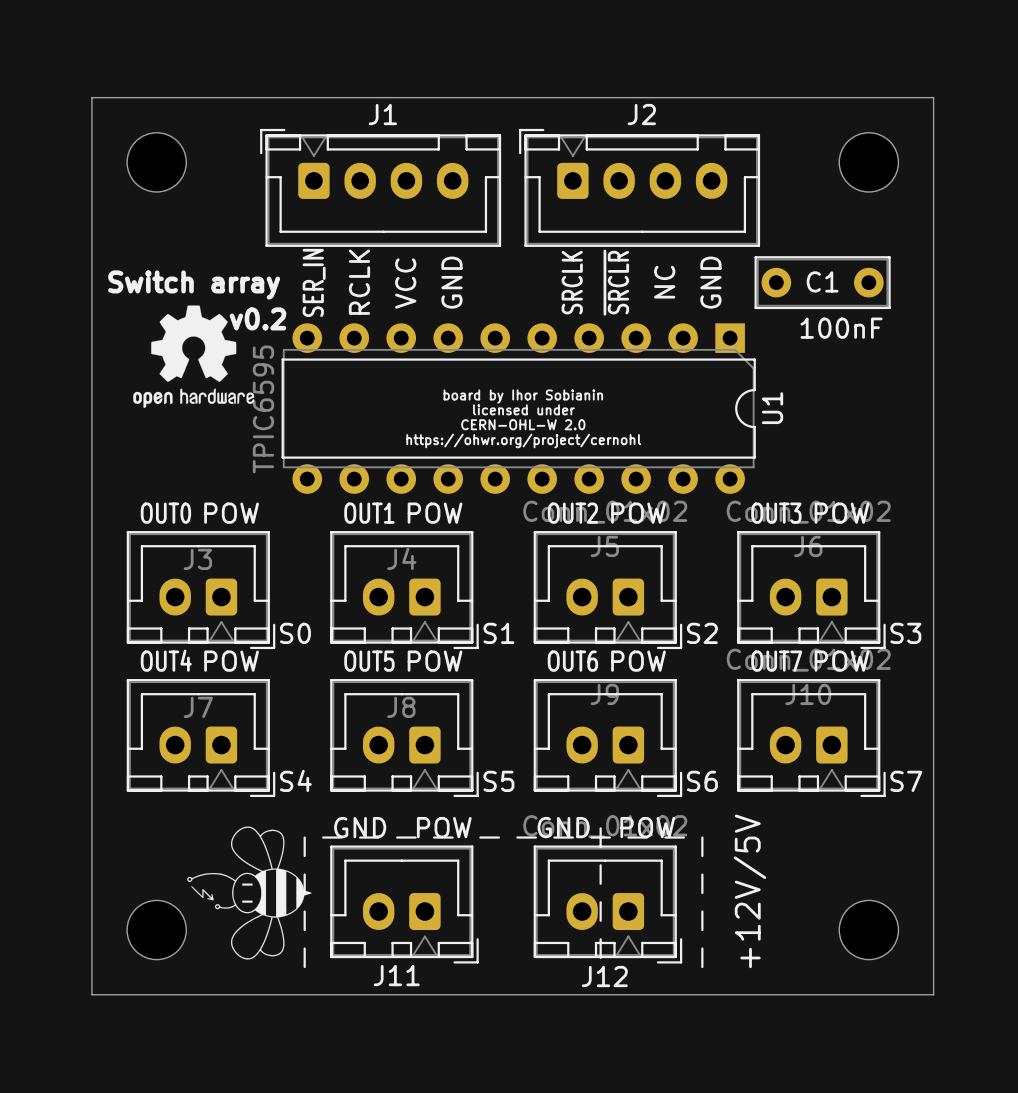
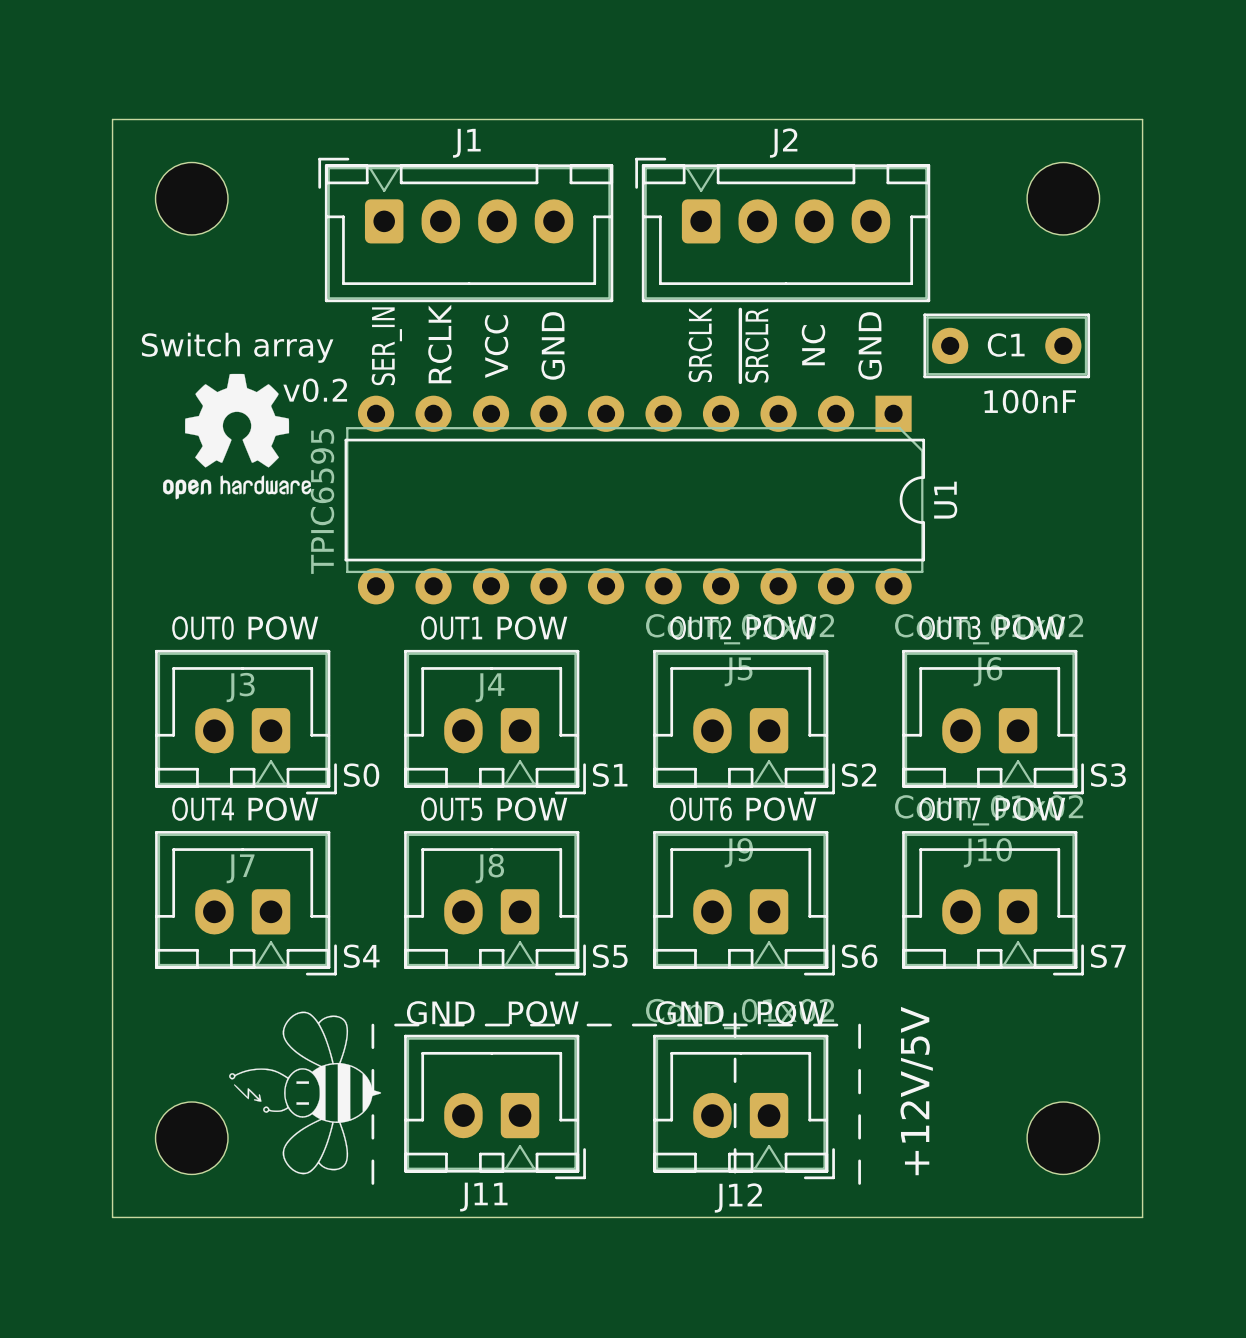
text: board by Ihor Sobianin (523, 396) -> none
text: licensed under (523, 409) -> none
text: CERN-OHL-W 2.0 (523, 424) -> none
text: https://ohwr.org/project/cernohl (523, 440) -> none

